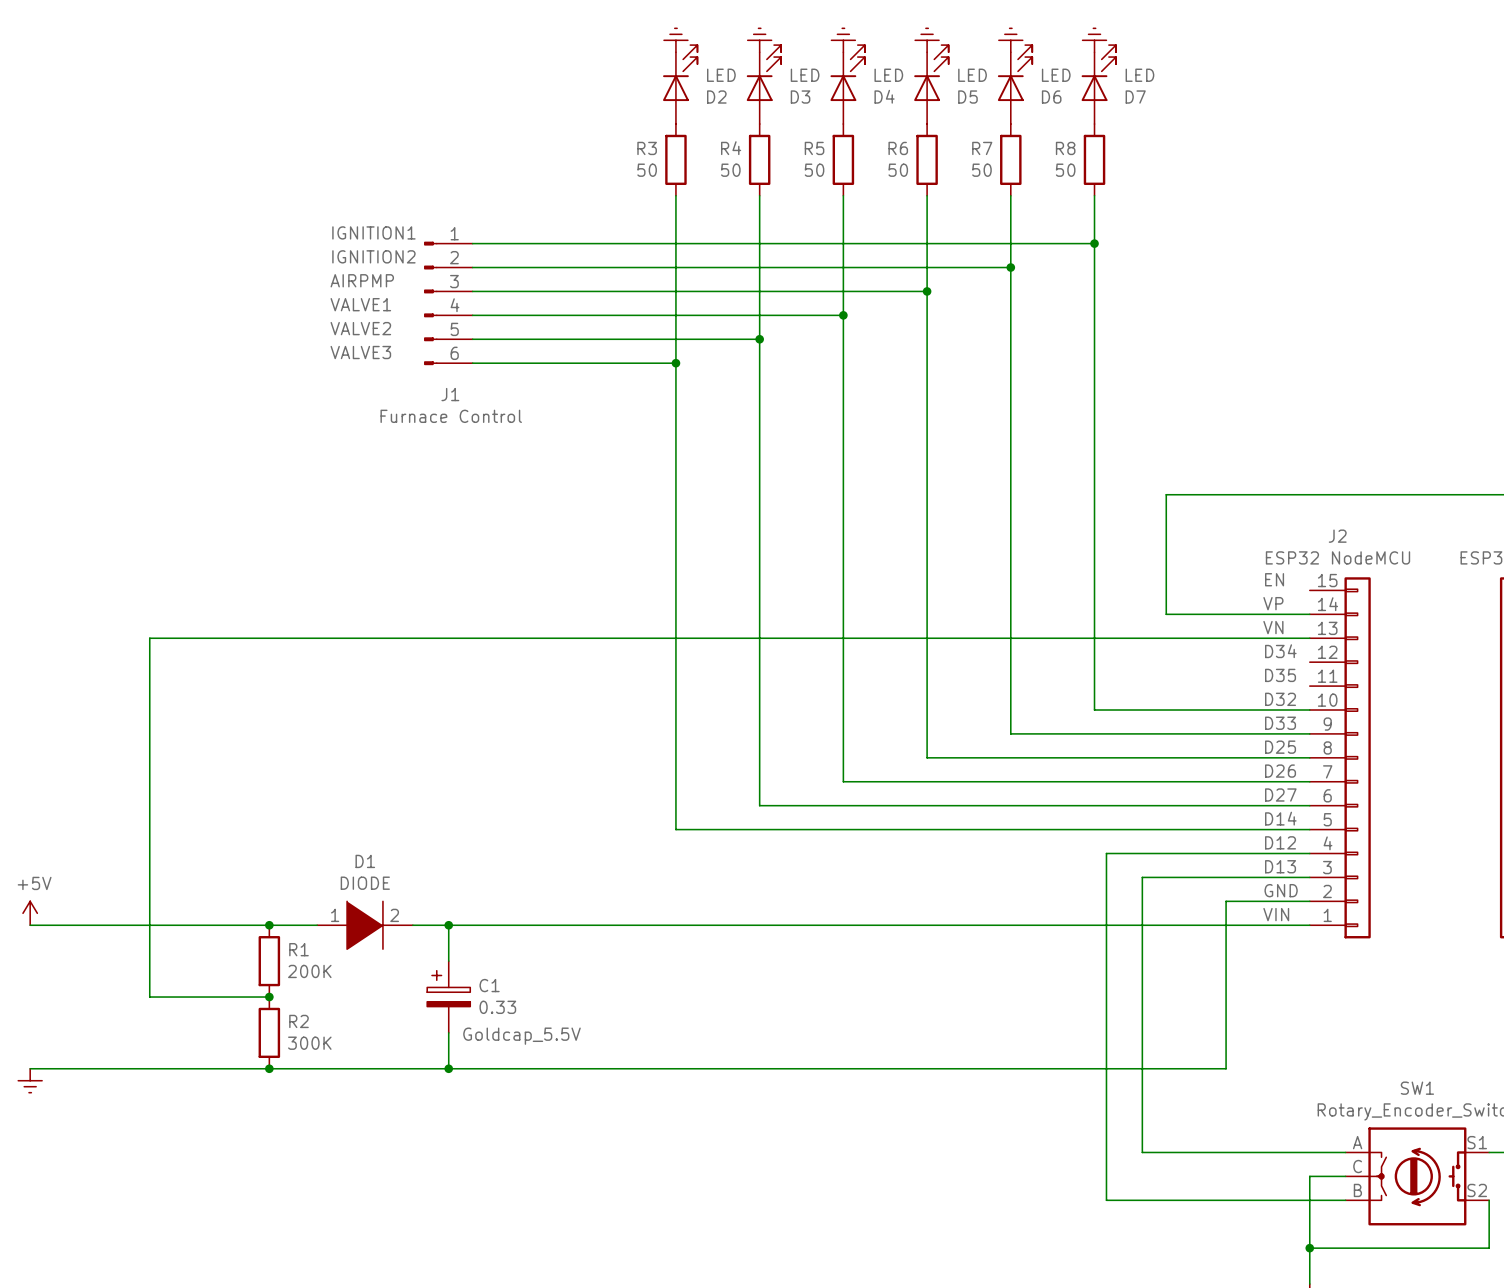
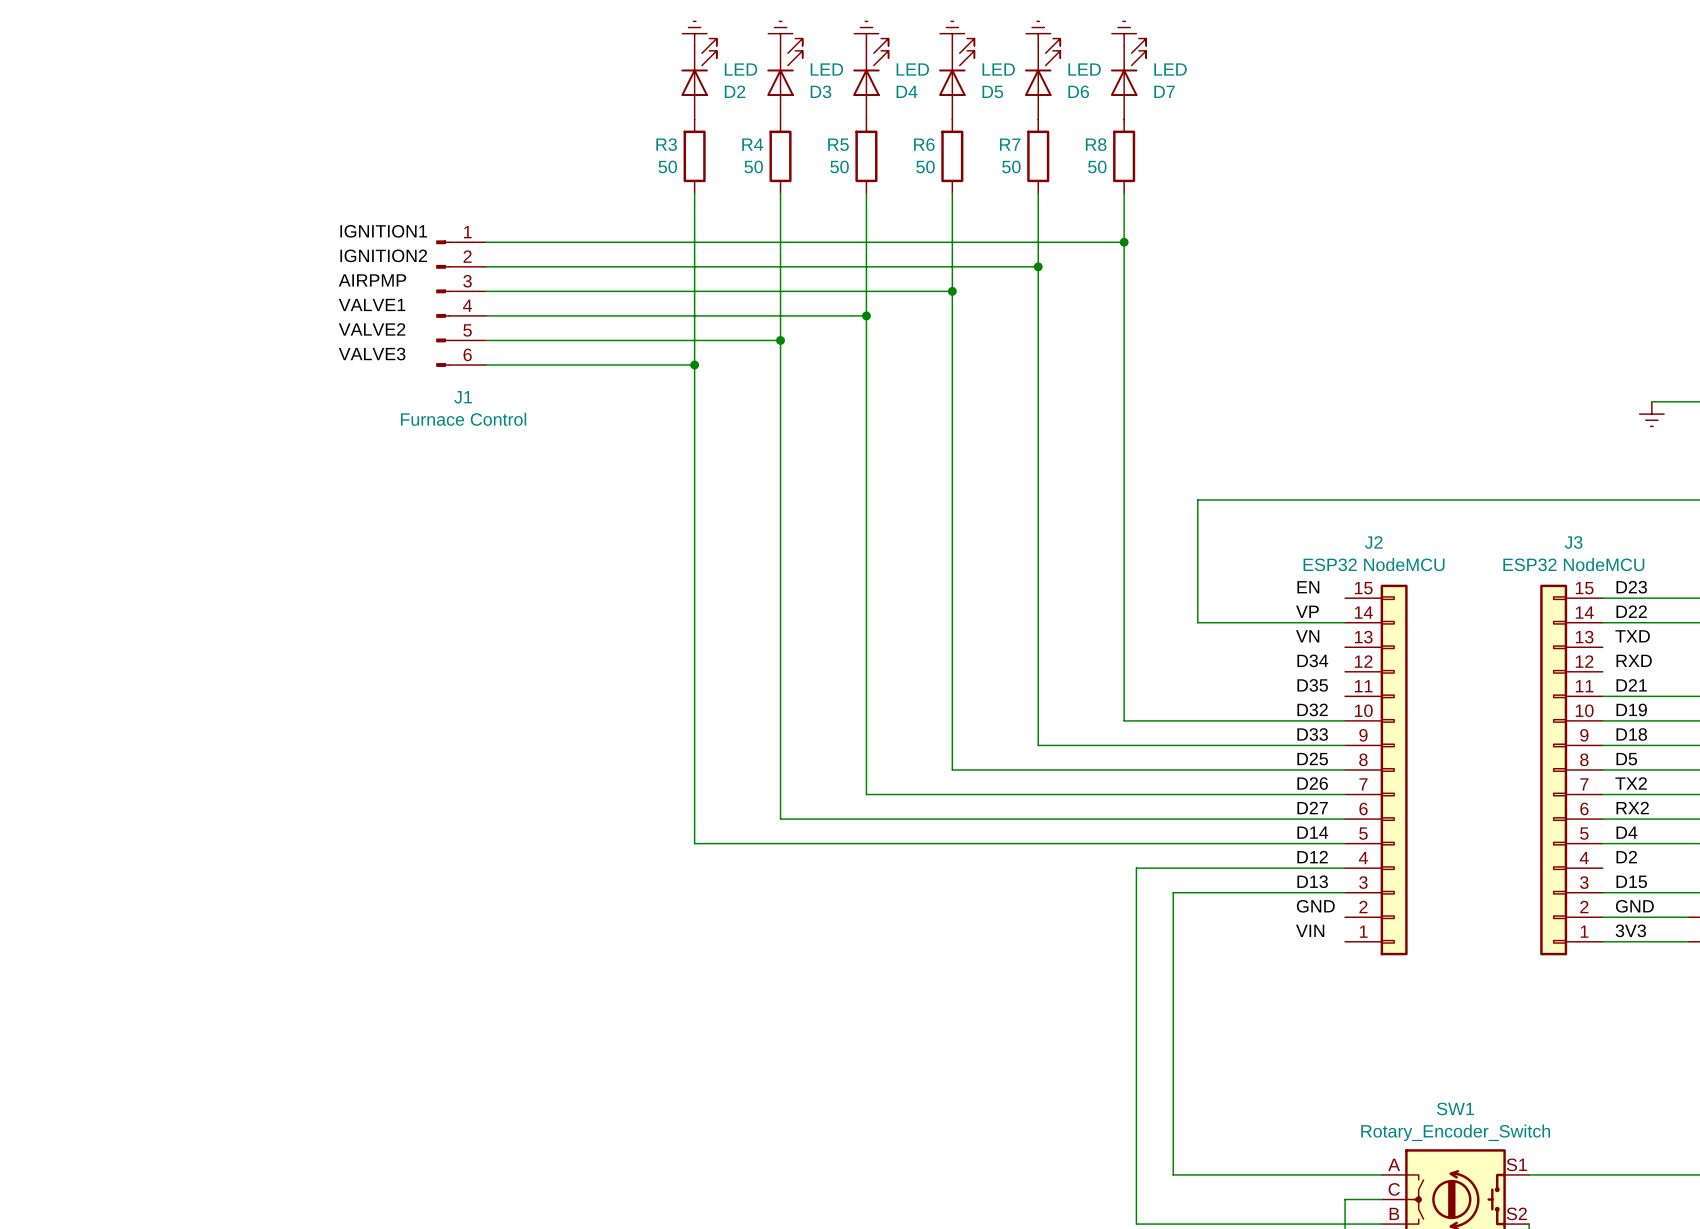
wire: (1309, 638) (149, 638) (149, 997) (269, 997) -> none
wire: (1309, 901) (1226, 901) (1226, 1068) (30, 1068) -> none
power symbol: +5V (30, 913) -> none
wire: (30, 925) (317, 925) -> none
junction: (269, 925) -> none
D1: DIODE (365, 925) -> none
wire: (412, 925) (1309, 925) -> none
wire: (448, 925) (448, 961) -> none
junction: (448, 925) -> none
R1: 200K (269, 961) -> none
junction: (269, 997) -> none
C1: 0.33 (448, 997) -> none
R2: 300K (269, 1032) -> none
wire: (448, 1032) (448, 1068) -> none
label: Goldcap_5.5V (522, 1036) -> none
junction: (269, 1068) -> none
junction: (448, 1068) -> none
power symbol: (30, 1080) -> none

